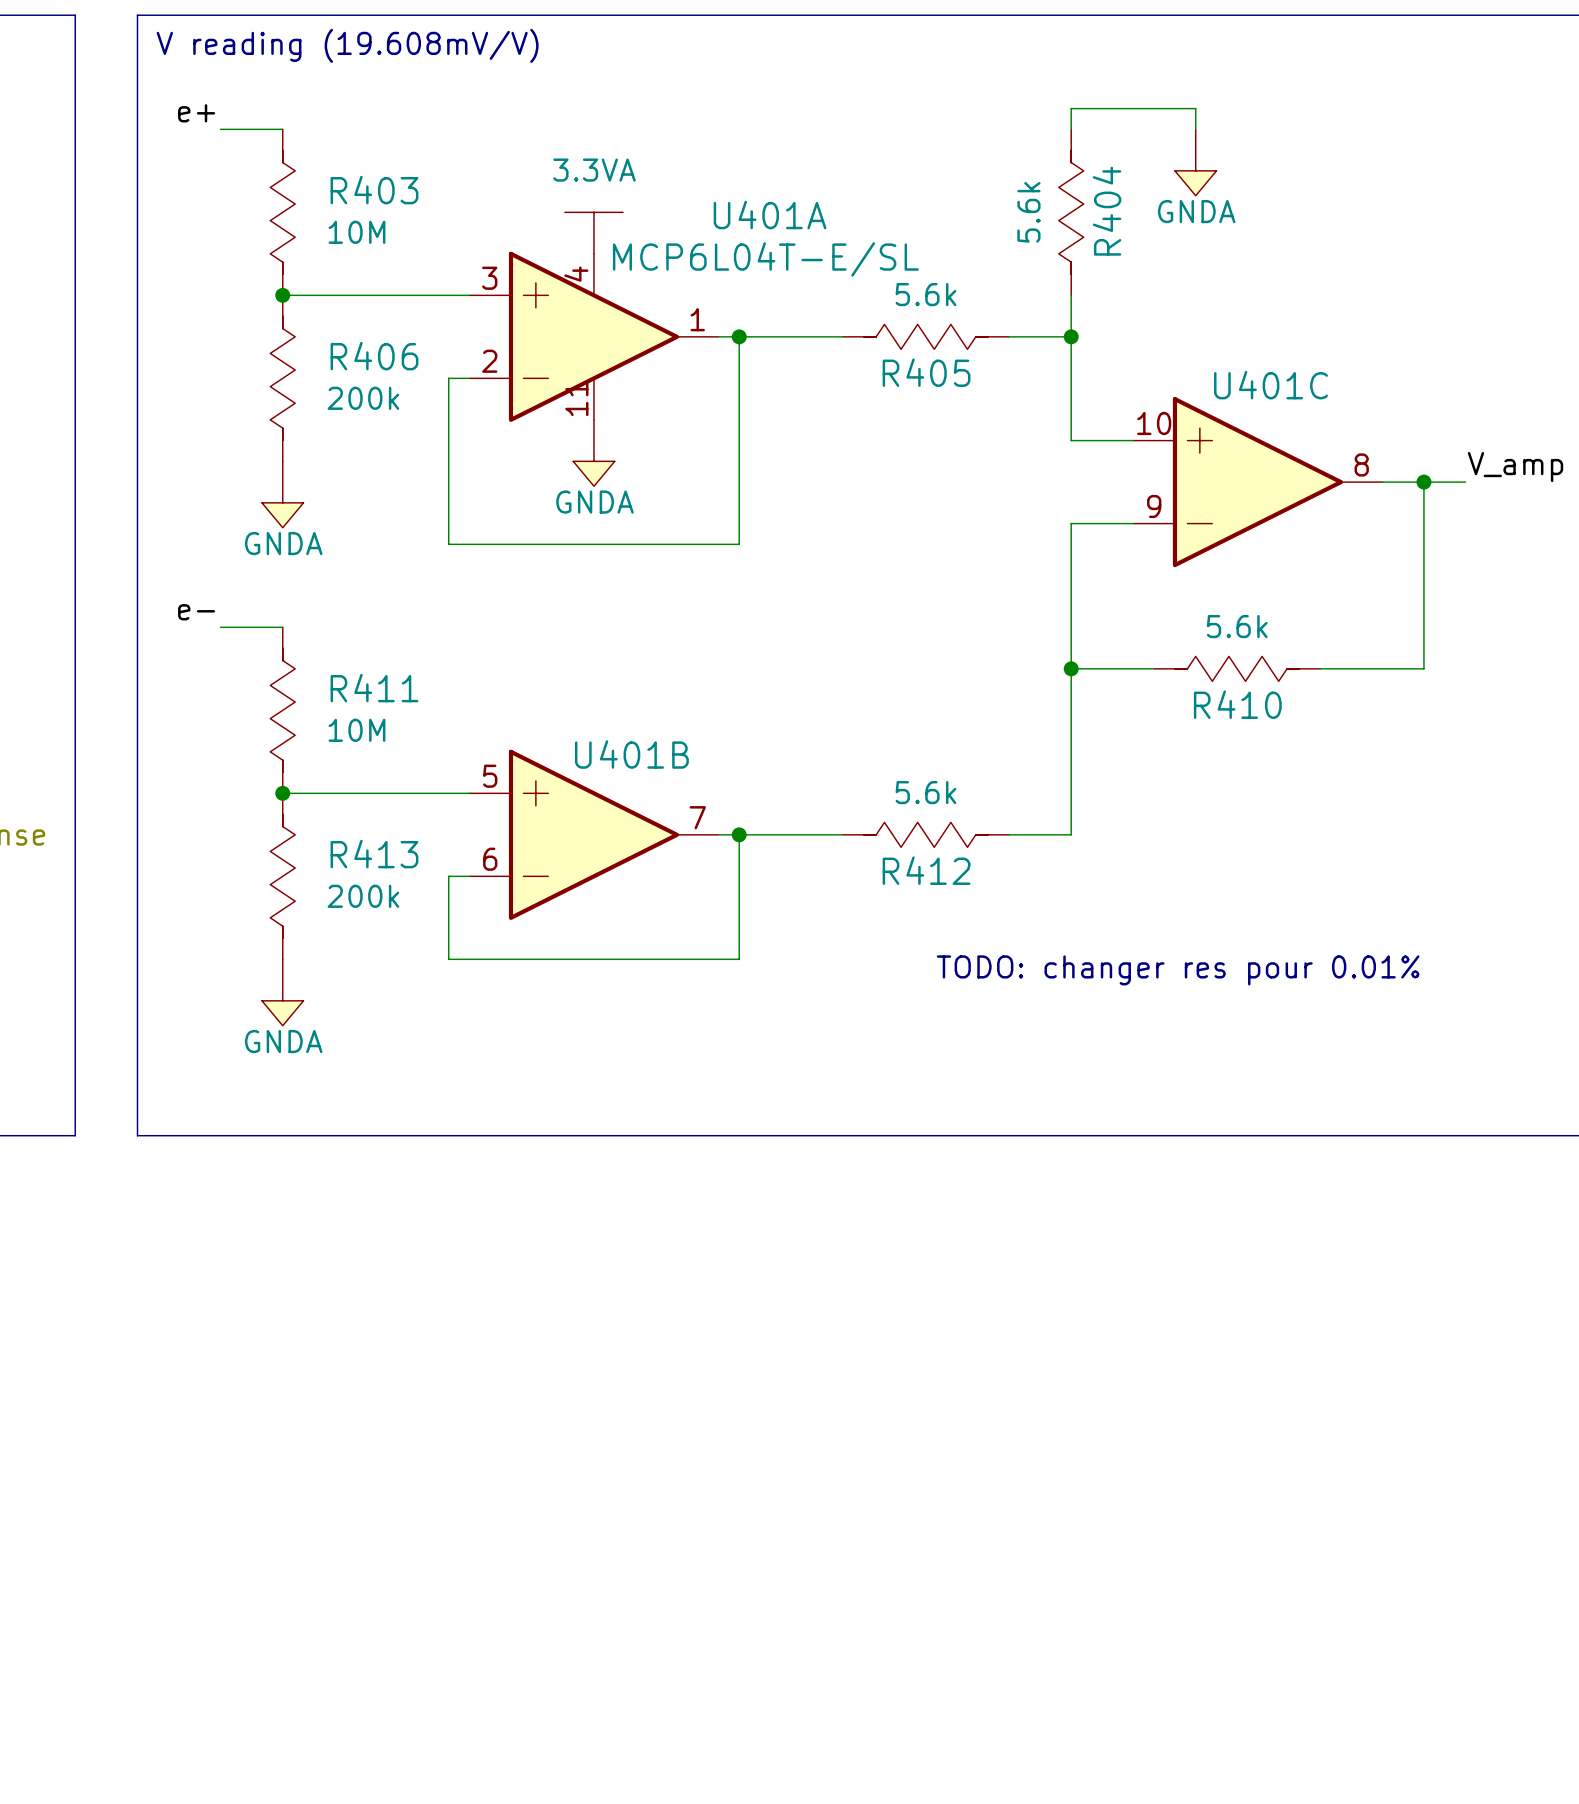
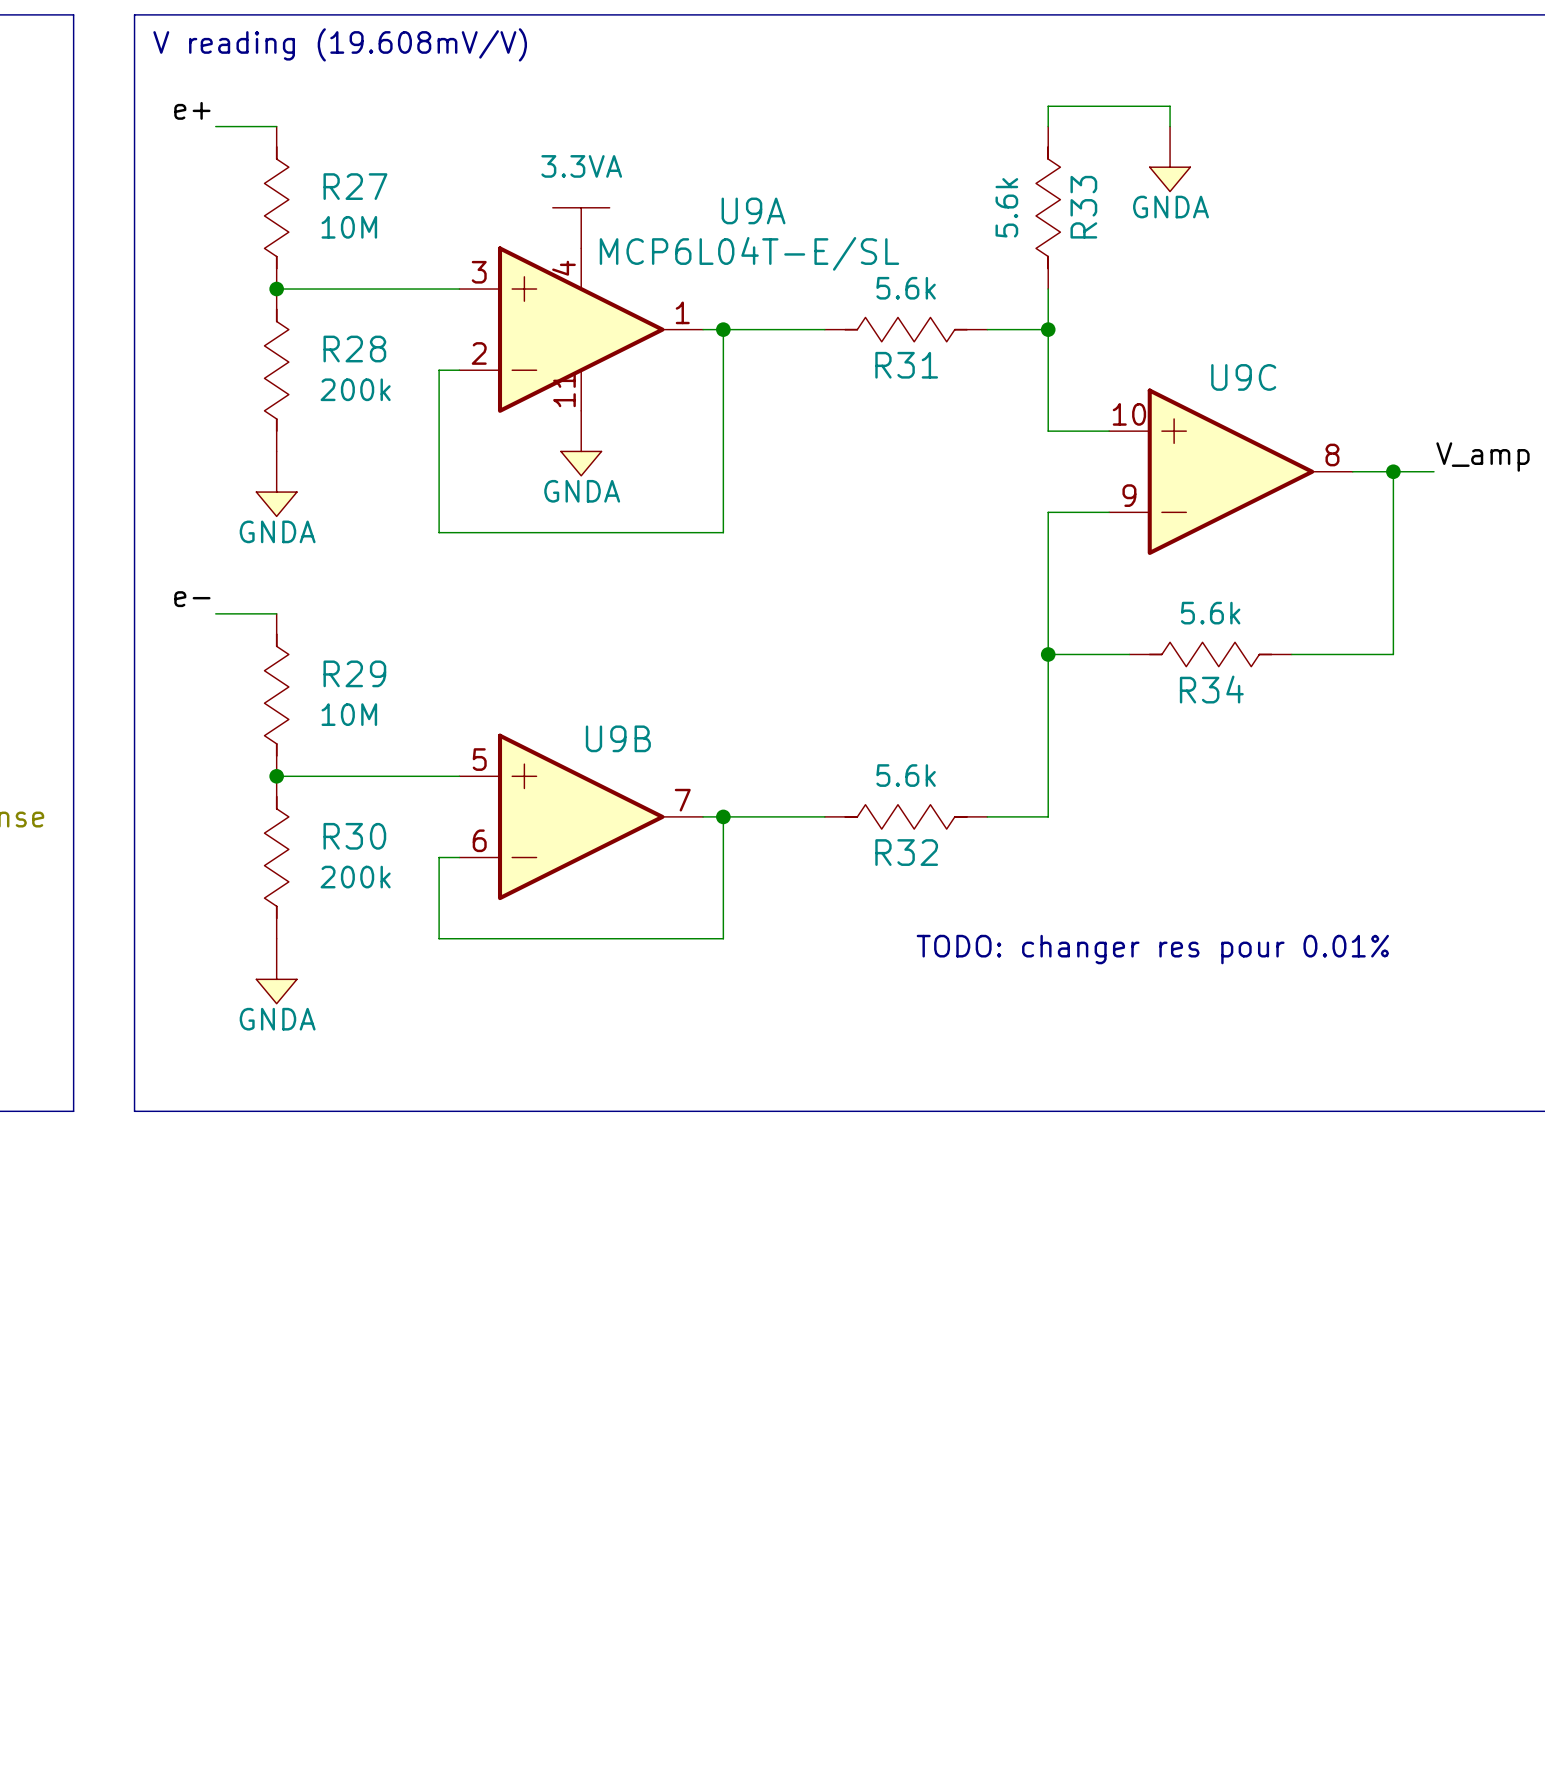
R403 name: R403 (374, 190) -> R27 (355, 186)
R404 name: R404 (1107, 211) -> R33 (1083, 207)
U401A name: U401A (770, 214) -> U9A (753, 210)
R406 name: R406 (374, 356) -> R28 (354, 349)
R405 name: R405 (926, 372) -> R31 (906, 365)
U401C name: U401C (1271, 385) -> U9C (1243, 377)
R411 name: R411 (374, 688) -> R29 (354, 673)
R410 name: R410 (1237, 704) -> R34 (1211, 689)
U401B name: U401B (631, 754) -> U9B (618, 738)
R413 name: R413 (374, 854) -> R30 (354, 836)
R412 name: R412 (926, 870) -> R32 (906, 852)

